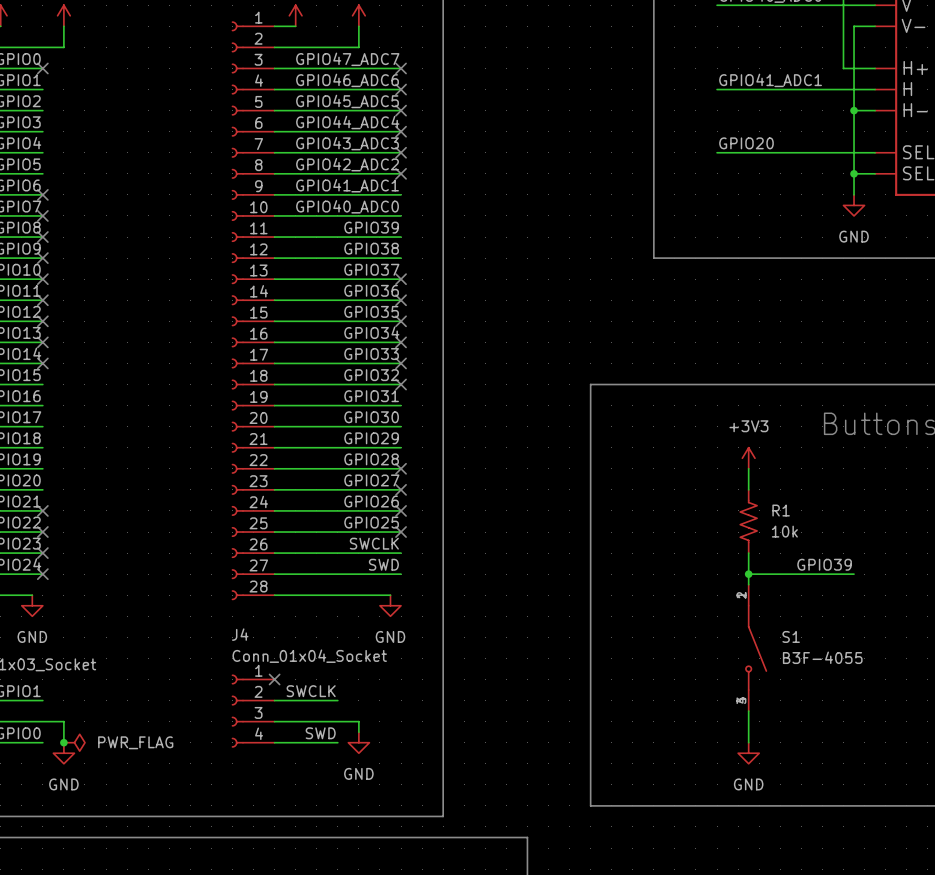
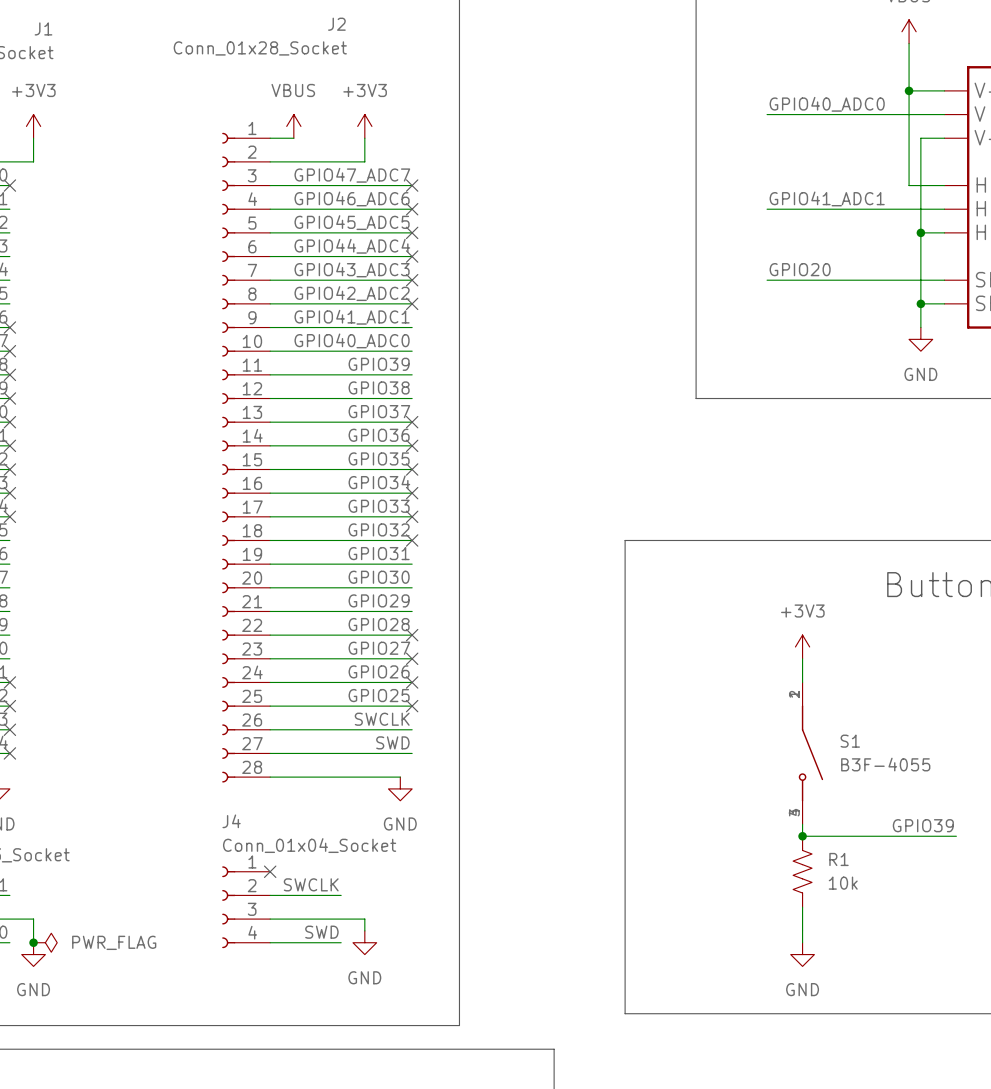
power symbol position: +3V3 (748, 458) -> +3V3 (802, 646)
R1 position: (748, 521) -> (802, 871)
wire: (748, 553) (748, 584) -> none
label position: GPIO39 (824, 564) -> GPIO39 (923, 825)
wire: (748, 574) (854, 574) -> none
junction: (748, 574) -> none
wire: none -> (802, 824) (802, 836) (956, 836)
junction: none -> (802, 836)
S1 position: (756, 647) -> (810, 753)

